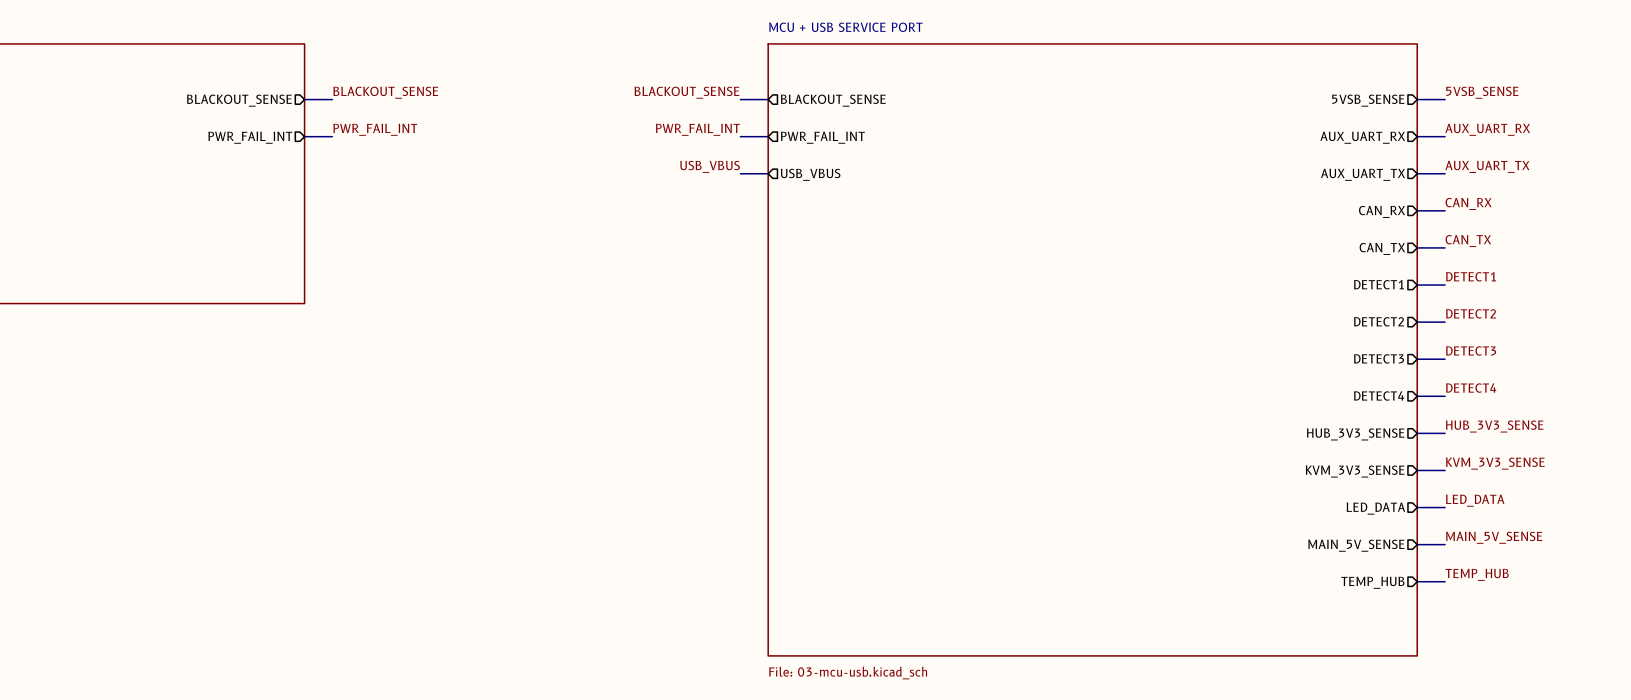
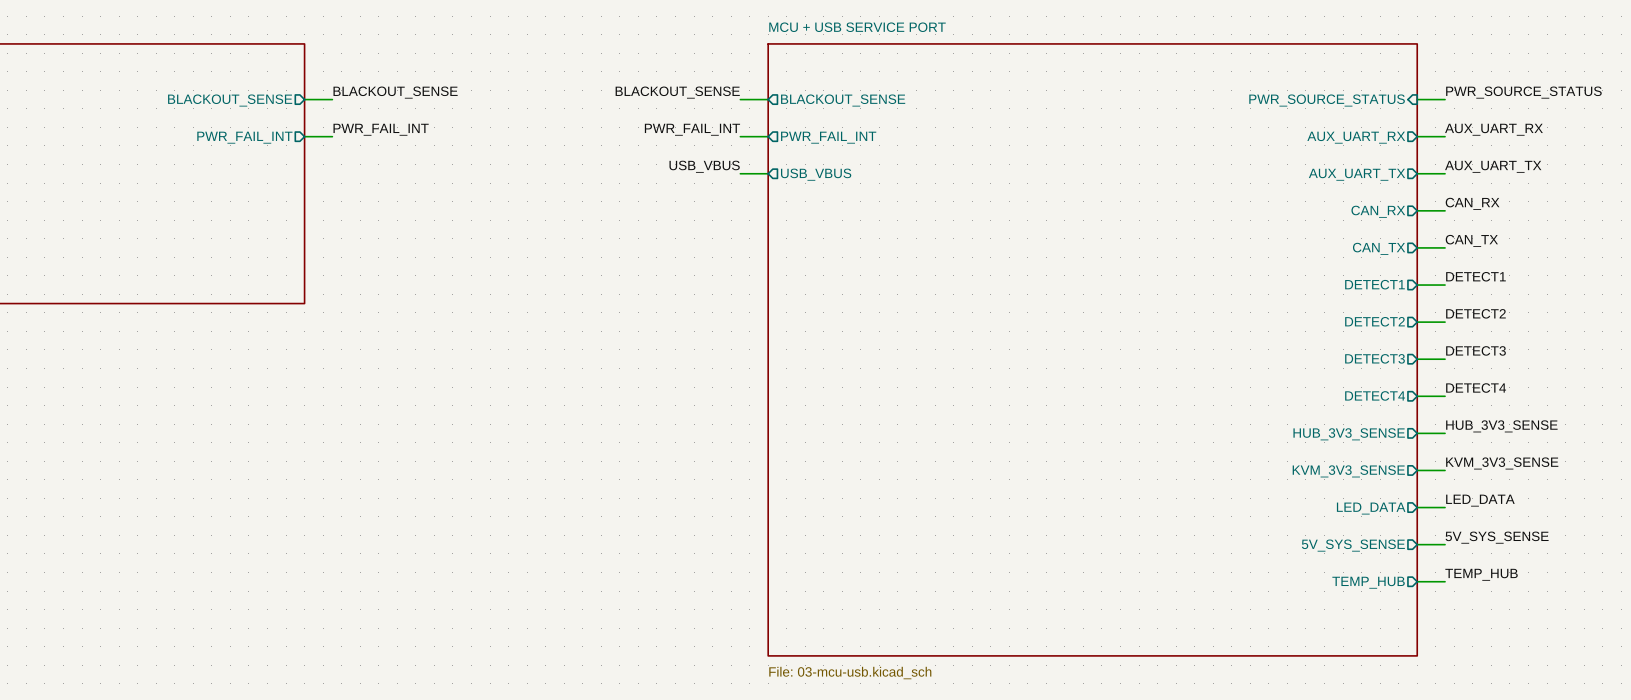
label: 5VSB_SENSE (1482, 92) -> PWR_SOURCE_STATUS (1523, 92)
sheet pin shape: output (1368, 100) -> input (1327, 100)
sheet pin: 5VSB_SENSE (1368, 100) -> PWR_SOURCE_STATUS (1327, 100)
label: MAIN_5V_SENSE (1494, 537) -> 5V_SYS_SENSE (1497, 537)
sheet pin: MAIN_5V_SENSE (1356, 545) -> 5V_SYS_SENSE (1353, 545)

